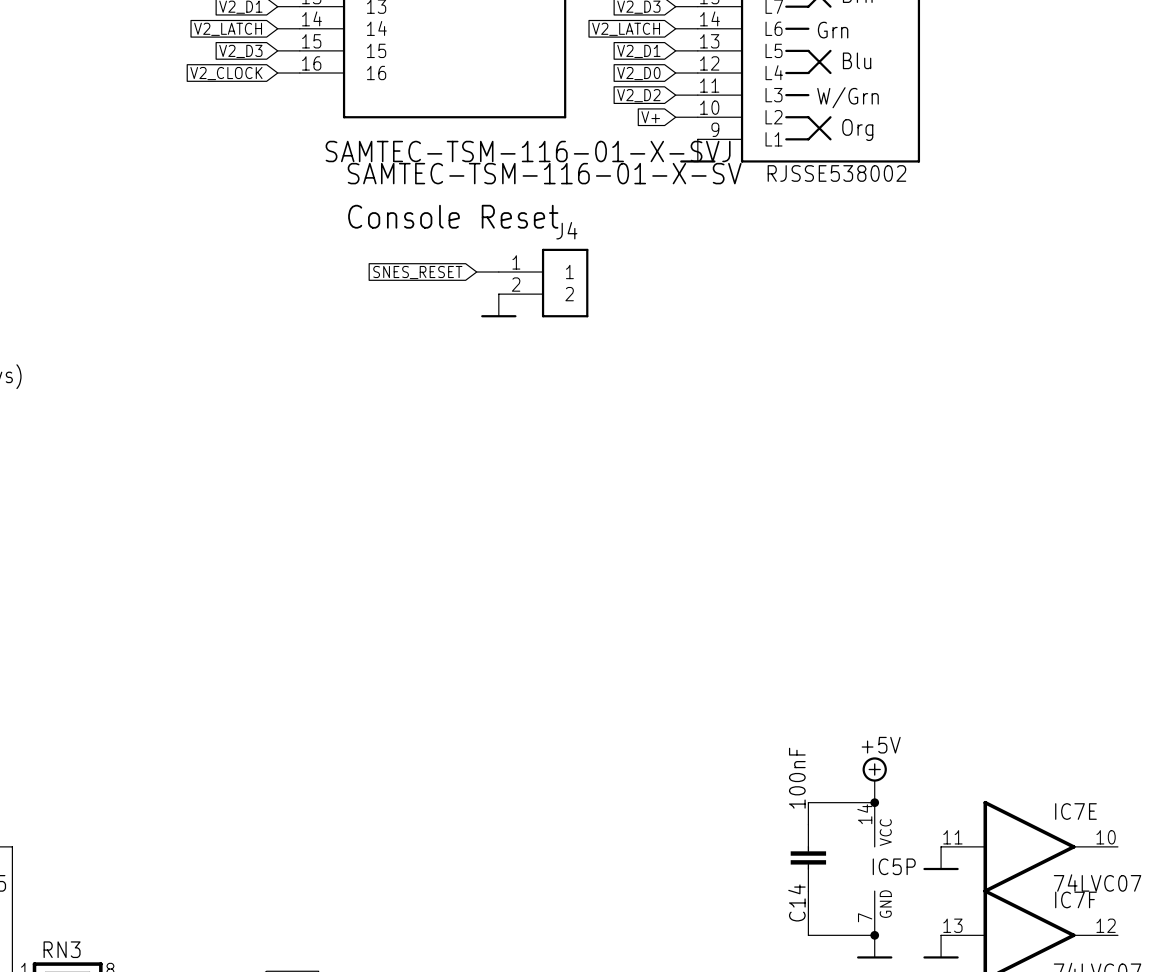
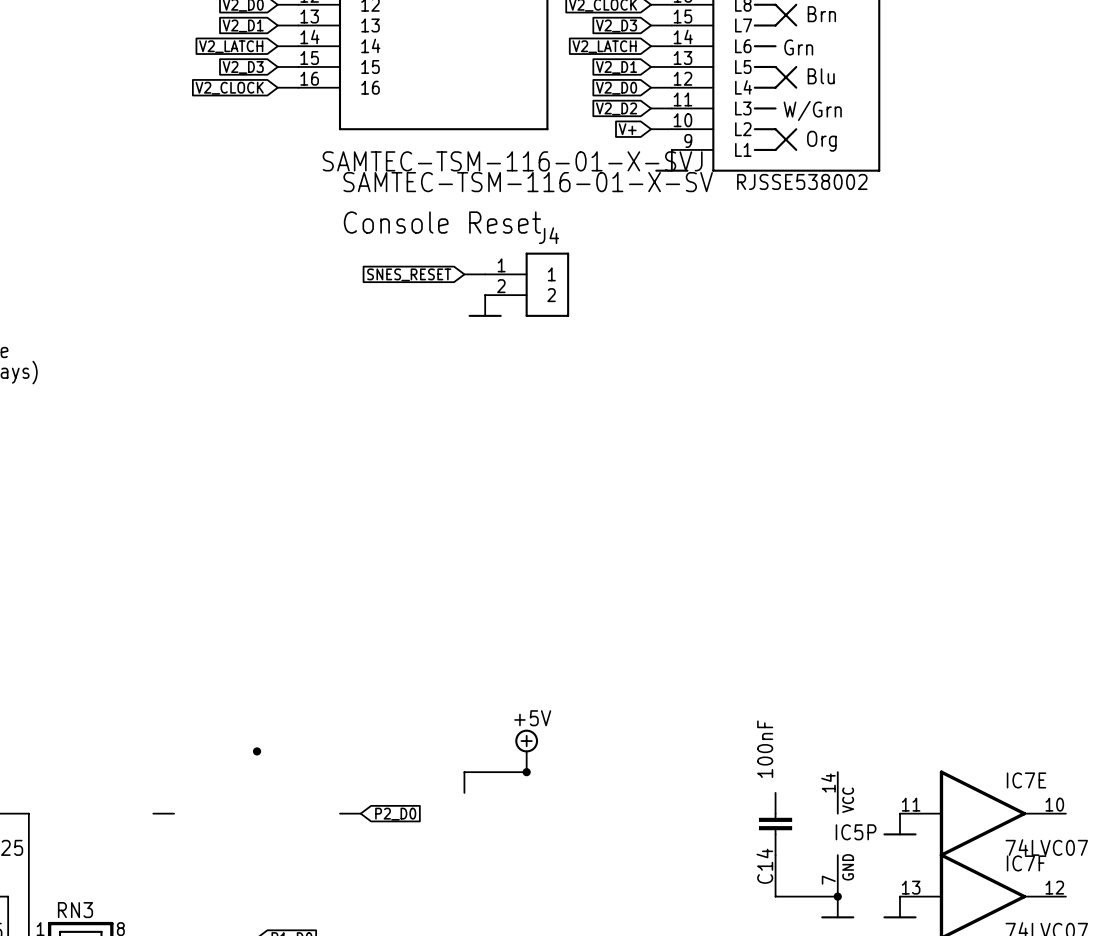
junction: none -> (257, 751)
power symbol: none -> +5V (526, 750)
power symbol: +5V (874, 780) -> none
wire: none -> (526, 772) (464, 772) (464, 792)
junction: none -> (526, 772)
wire: (874, 802) (808, 802) (808, 824) -> none
junction: (874, 802) -> none
wire: none -> (153, 813) (174, 813)
wire: none -> (339, 813) (360, 813)
global label: none -> P2_D0 (395, 814)

